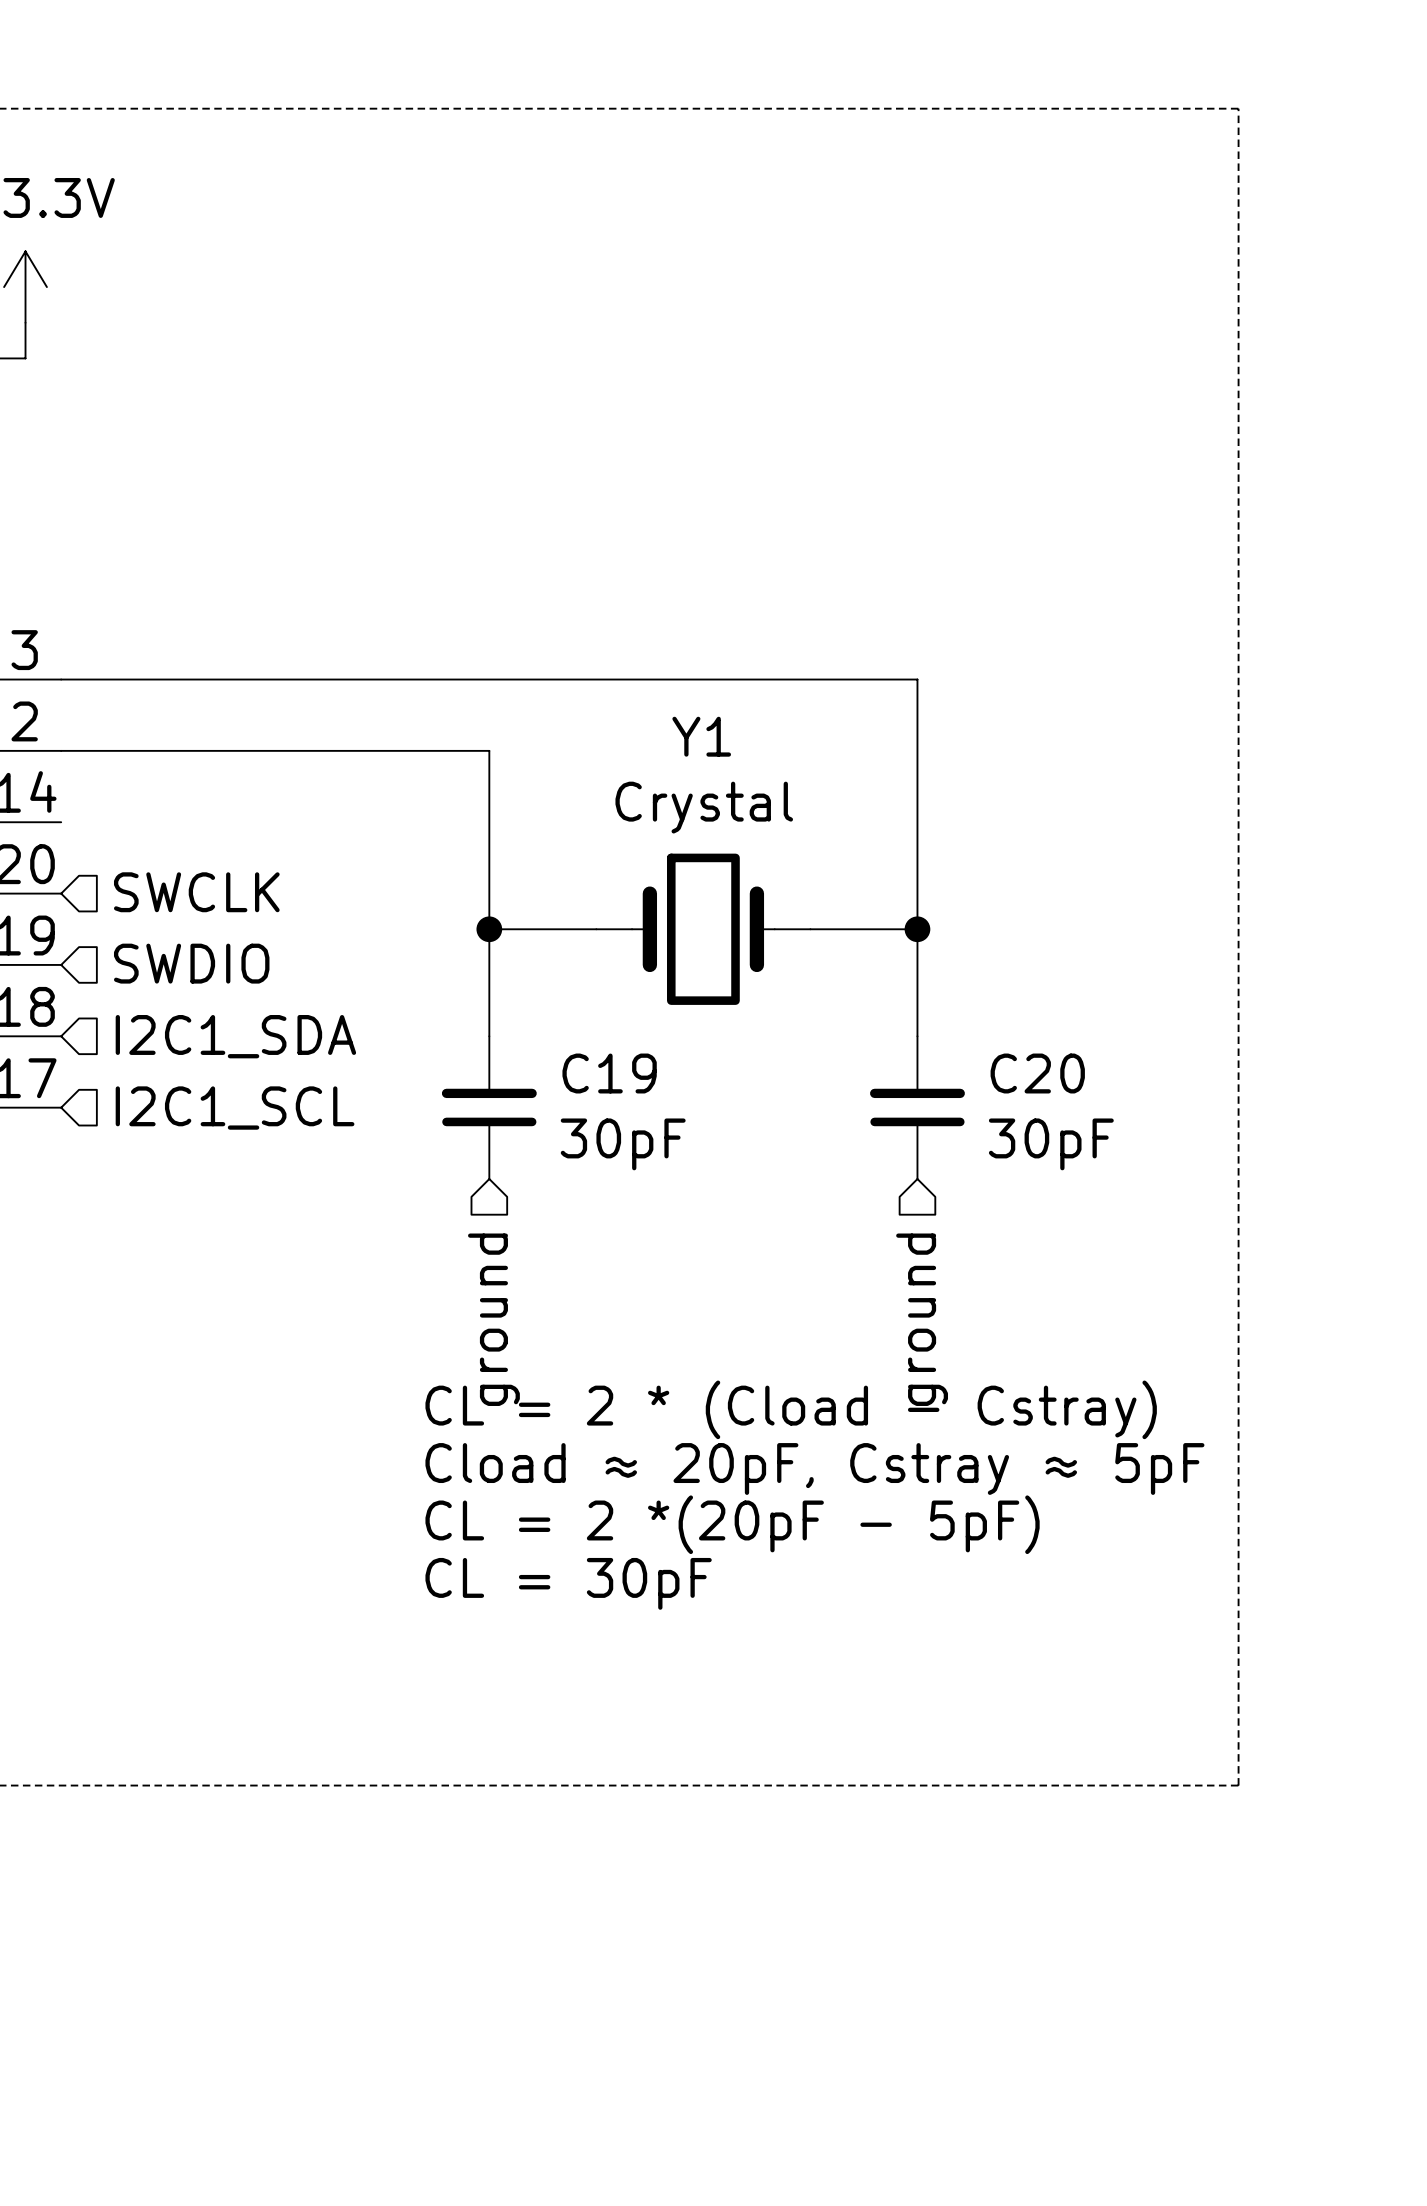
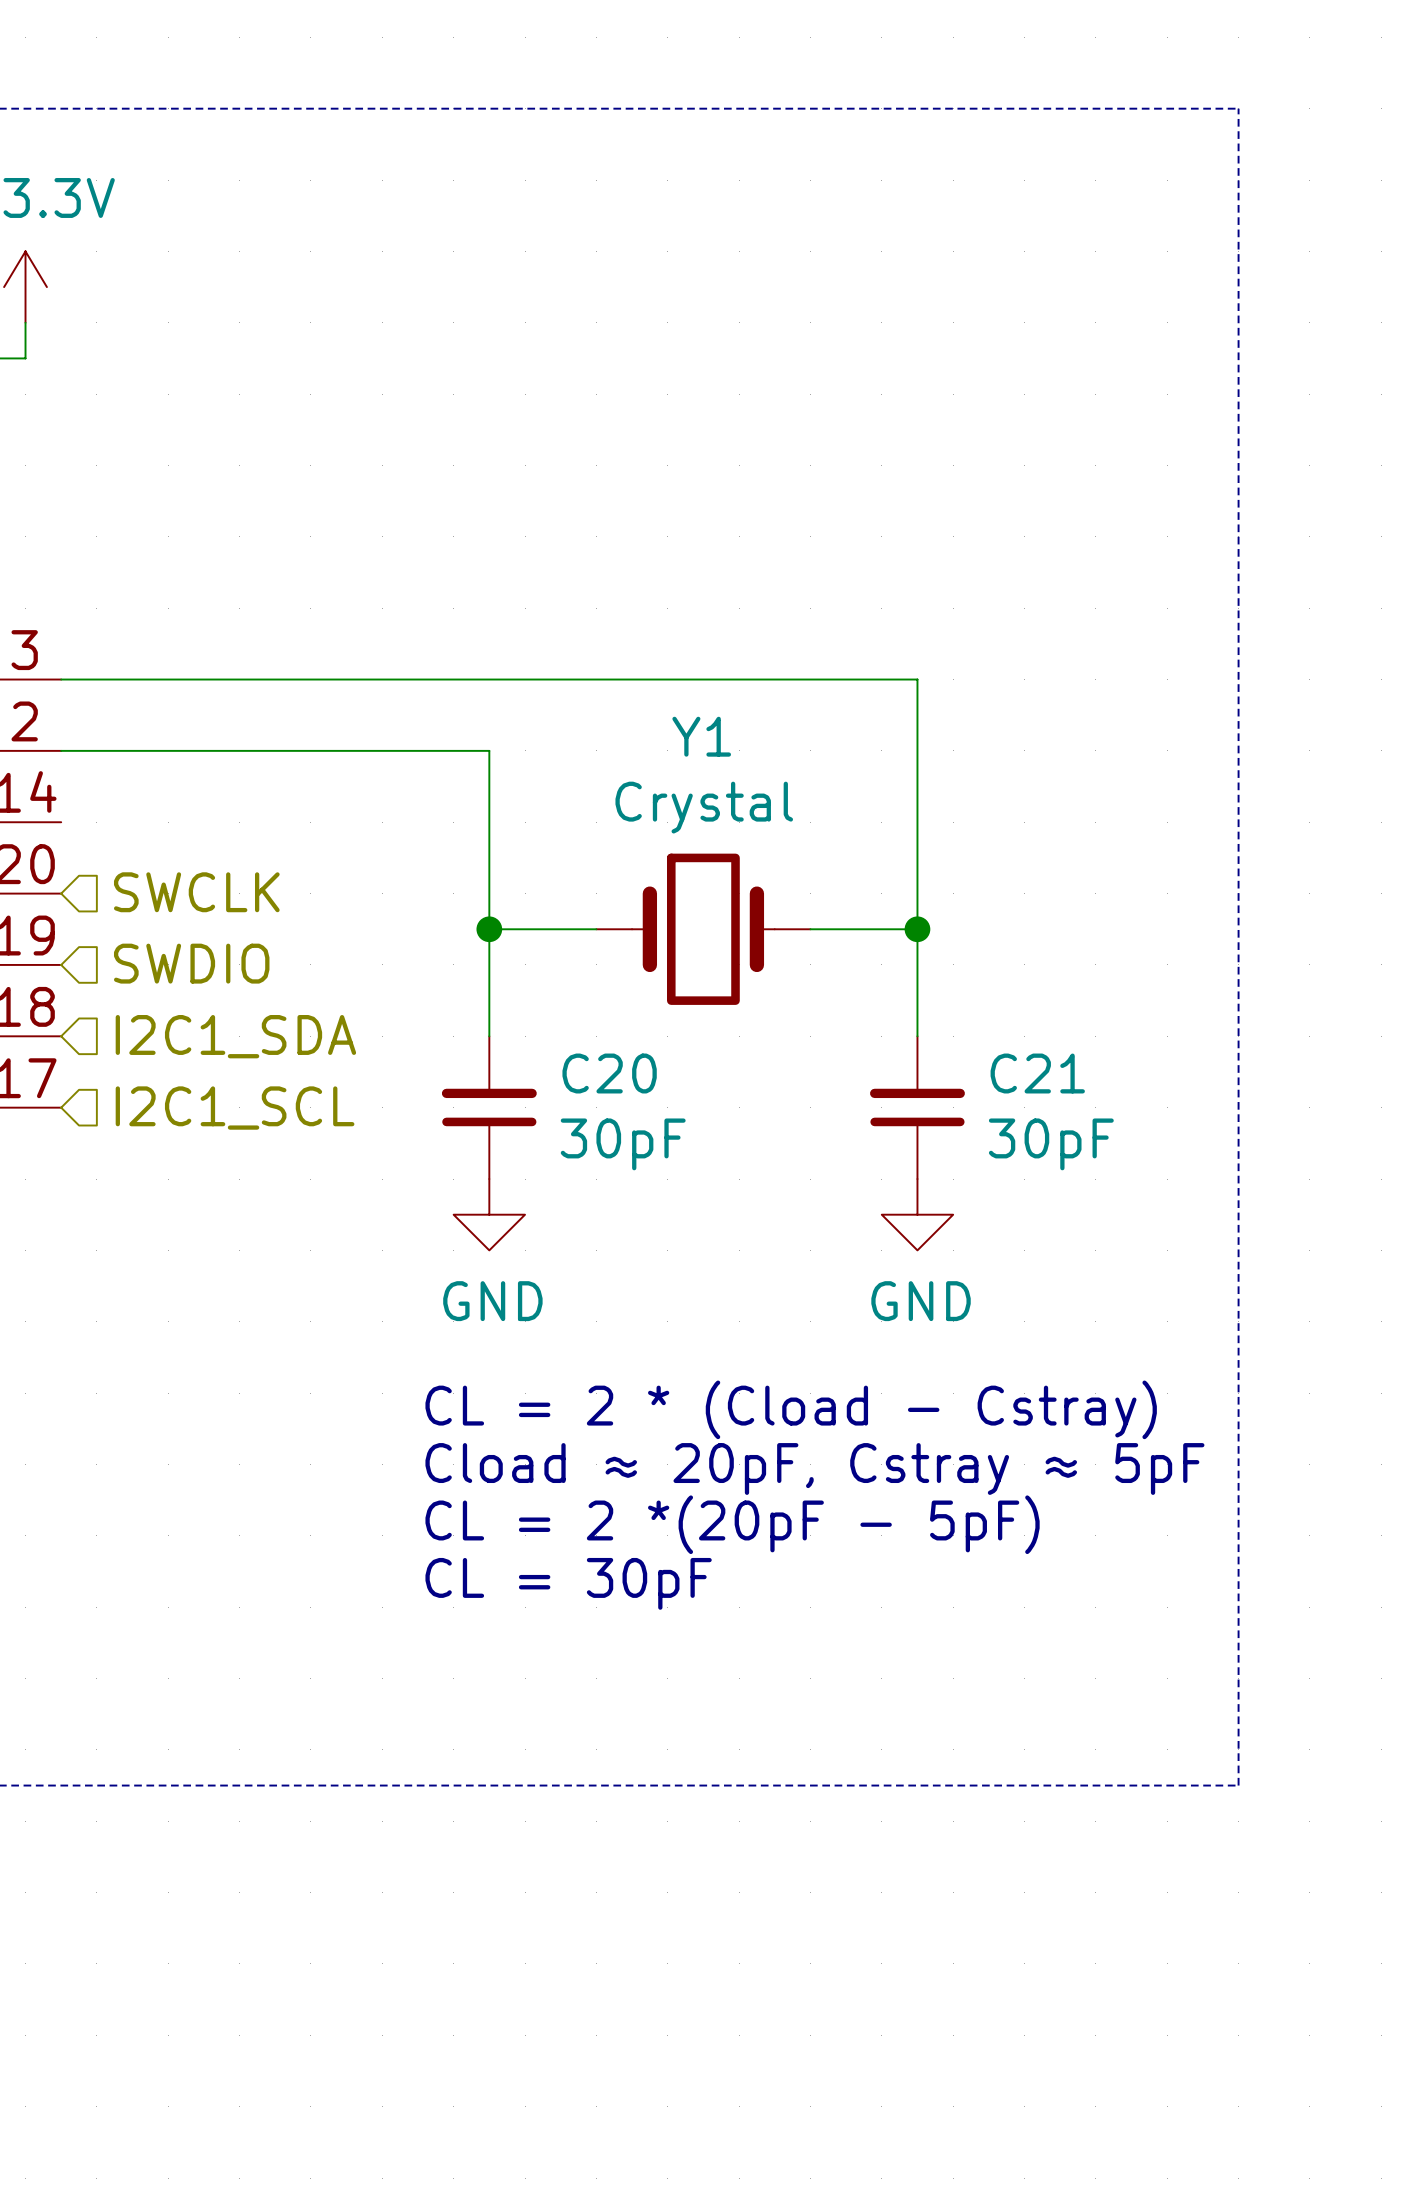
C19 name: C19 (609, 1073) -> C20 (609, 1073)
C20 name: C20 (1037, 1073) -> C21 (1037, 1073)
power symbol: none -> GND (489, 1214)
power symbol: none -> GND (917, 1214)
hierarchical label: ground (493, 1319) -> none
hierarchical label: ground (922, 1319) -> none

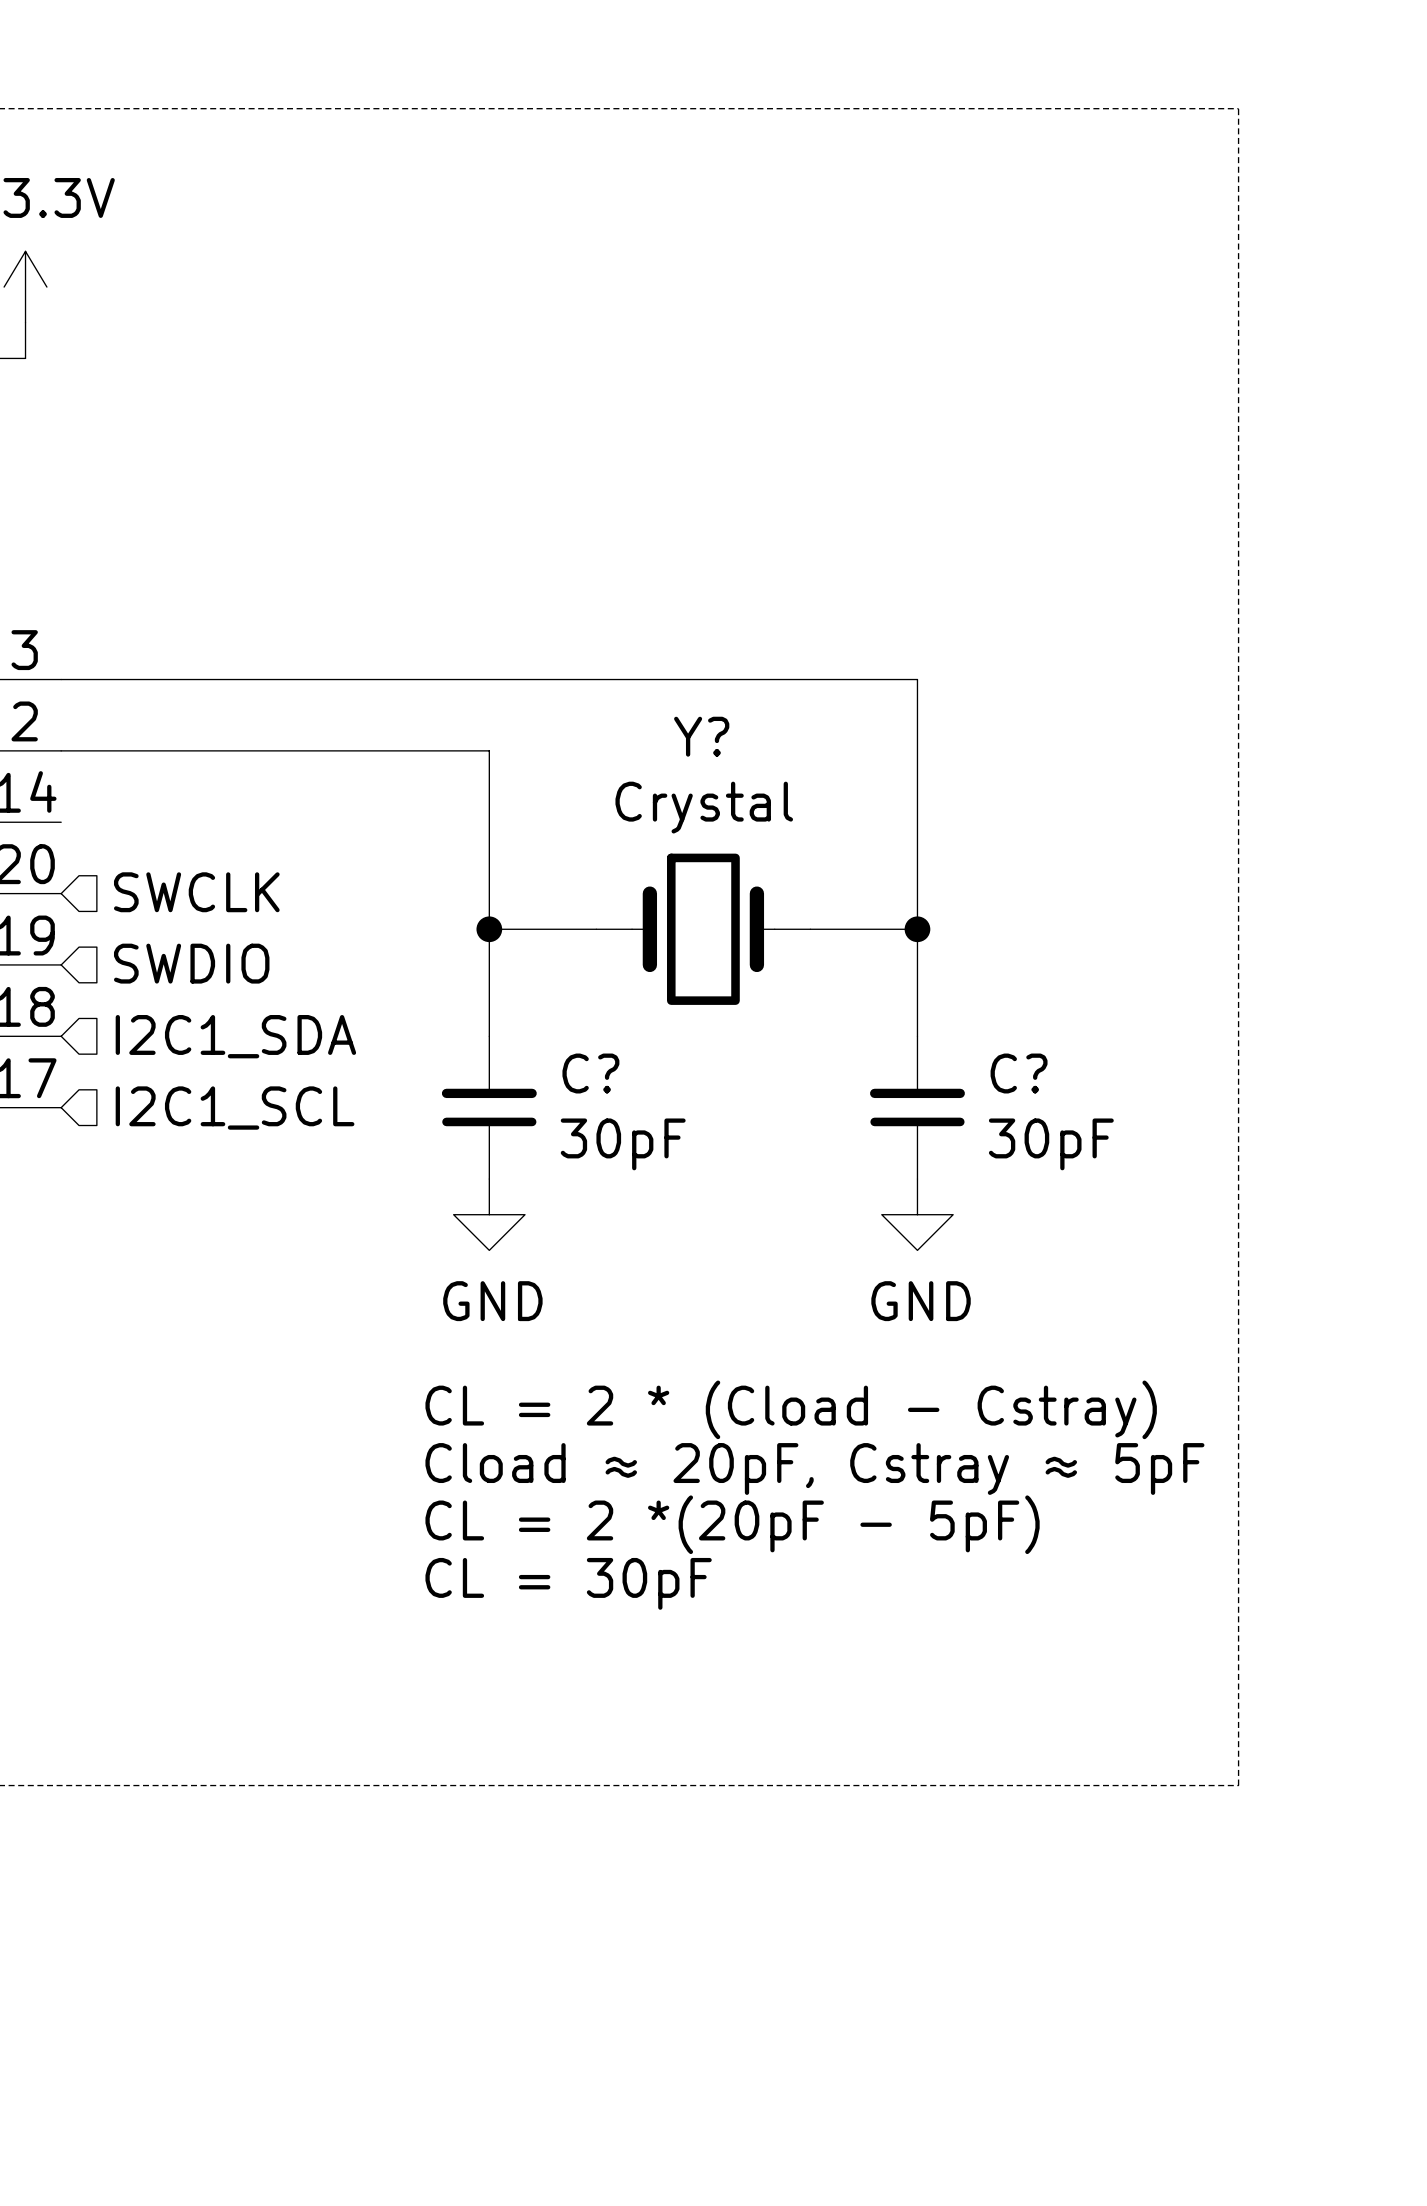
Y1 name: Y1 (701, 736) -> Y? (701, 736)
C20 name: C20 (609, 1073) -> C? (590, 1073)
C21 name: C21 (1037, 1073) -> C? (1019, 1073)

